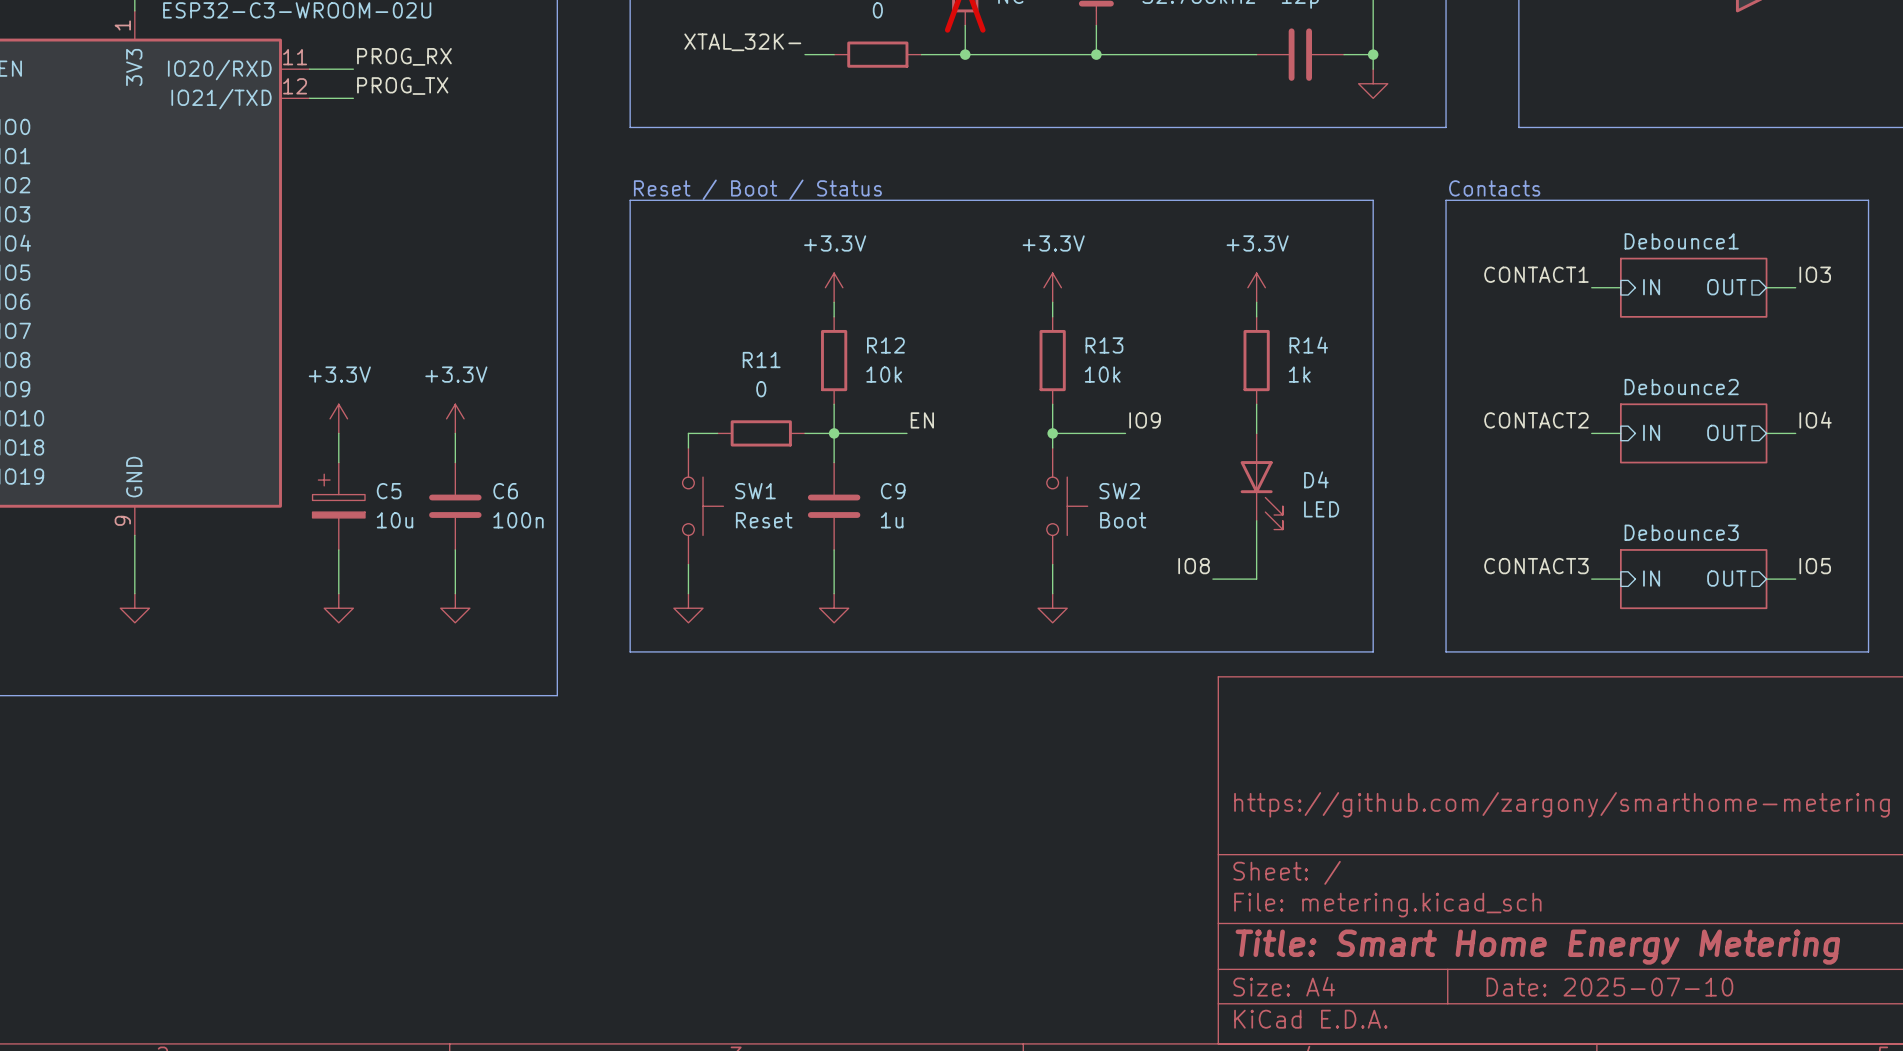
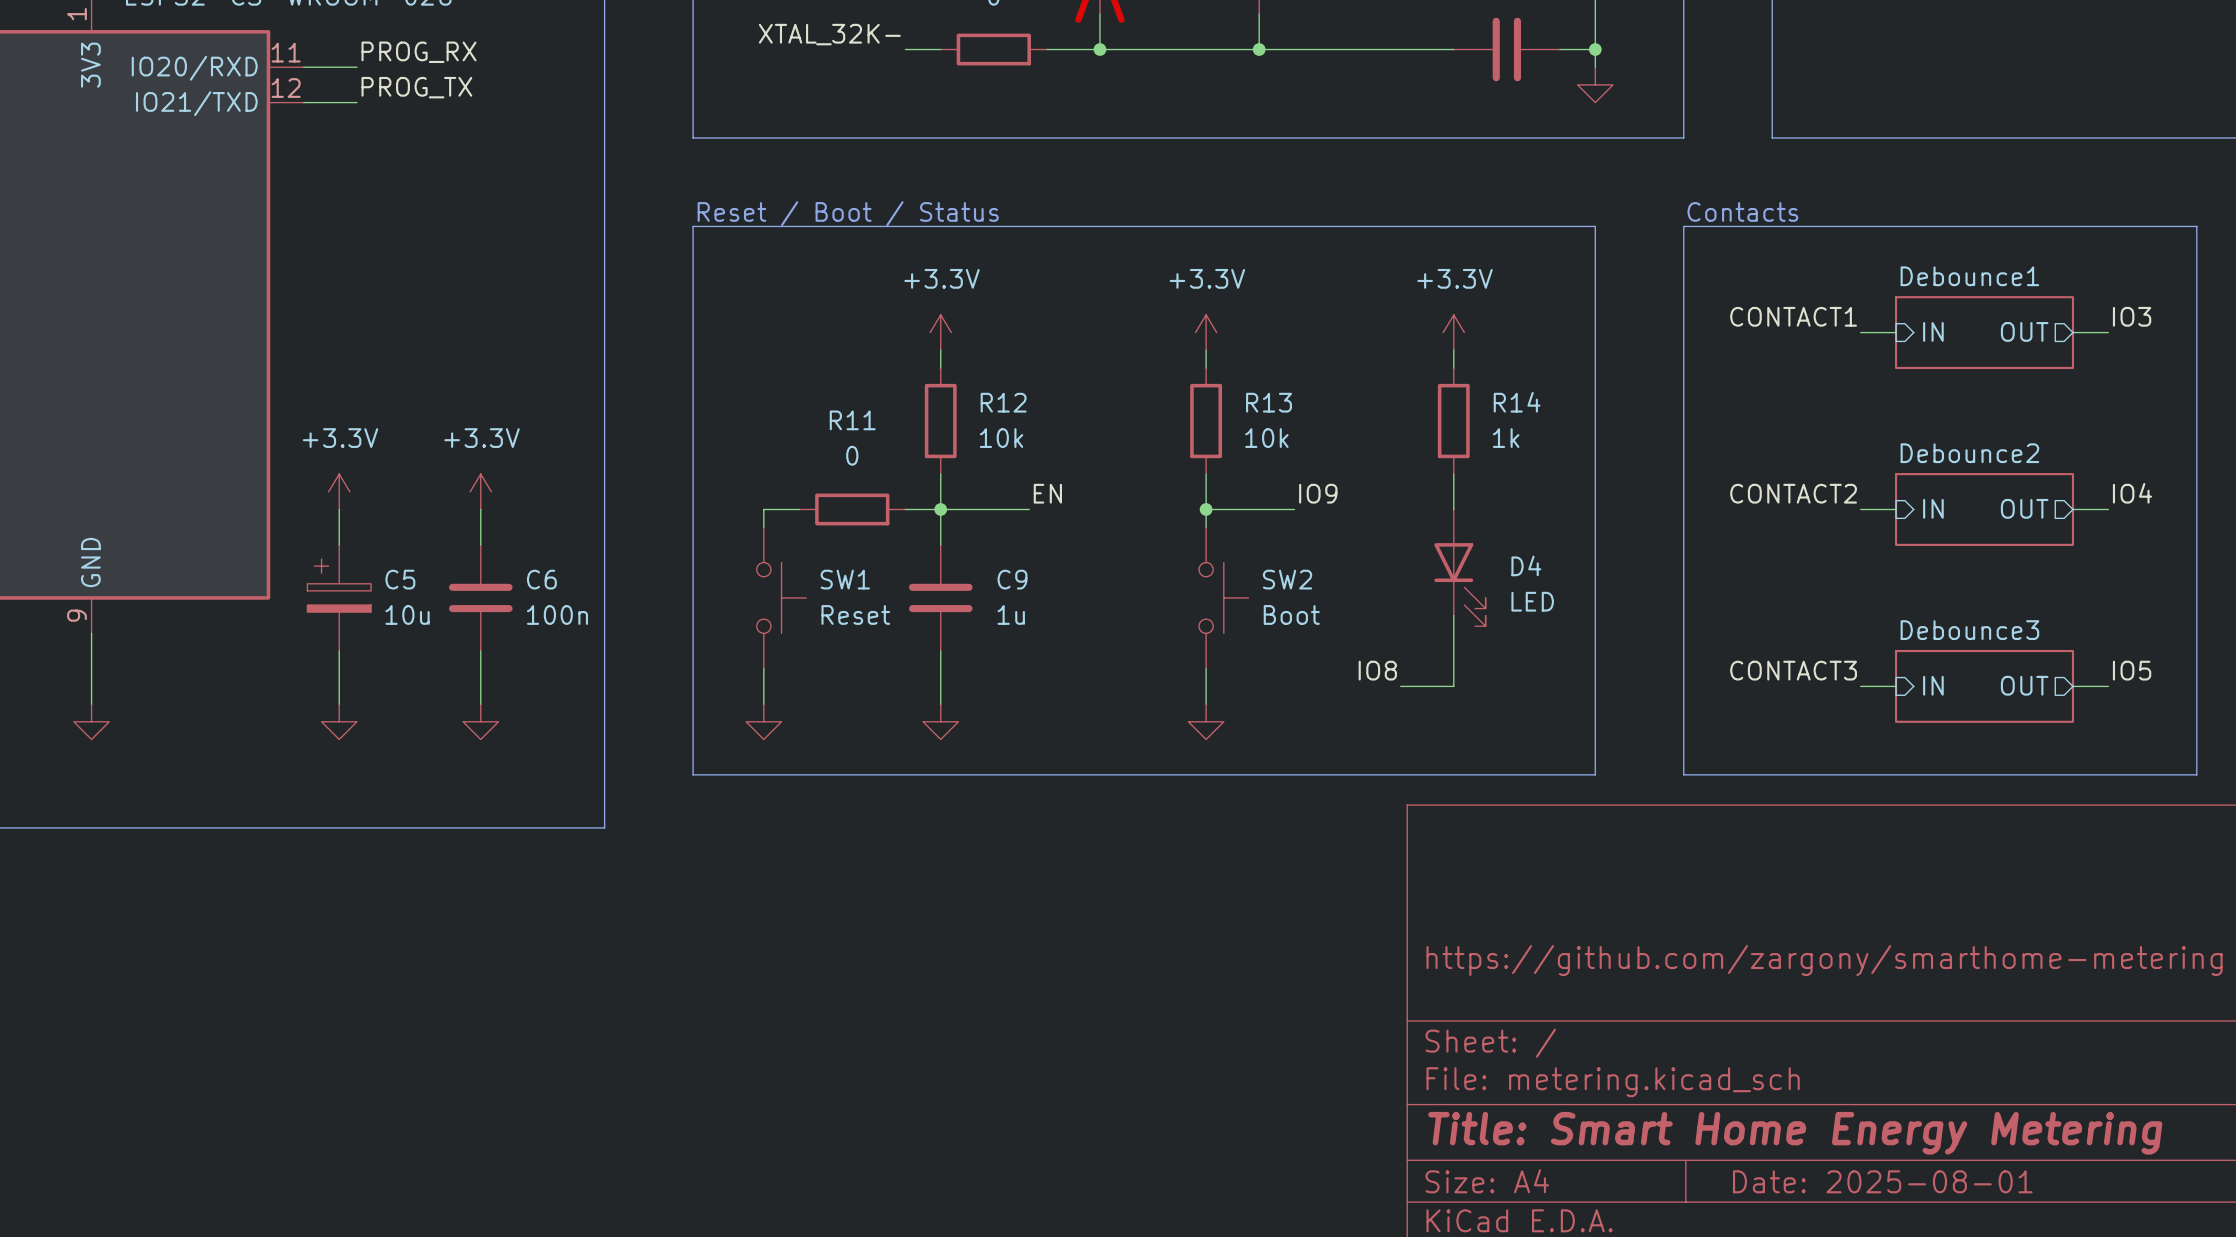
title block: Date: 2025-07-10 (1609, 987) -> Date: 2025-08-01 (1882, 1181)

